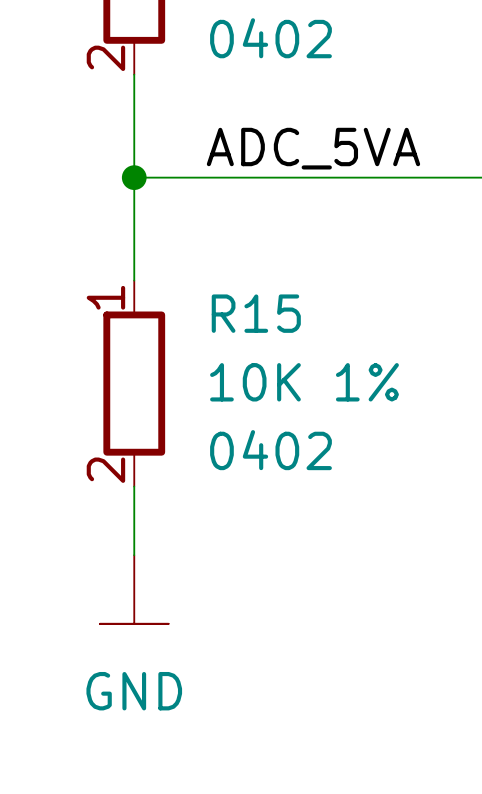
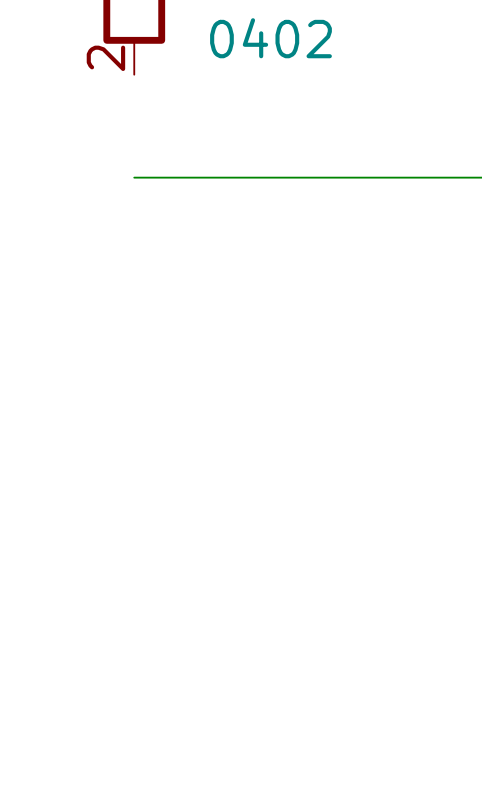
wire: (134, 74) (134, 280) -> none
label: ADC_5VA (313, 148) -> none
junction: (134, 177) -> none
R15: 10K 1% (134, 383) -> none
wire: (134, 486) (134, 555) -> none
power symbol: GND (134, 589) -> none

